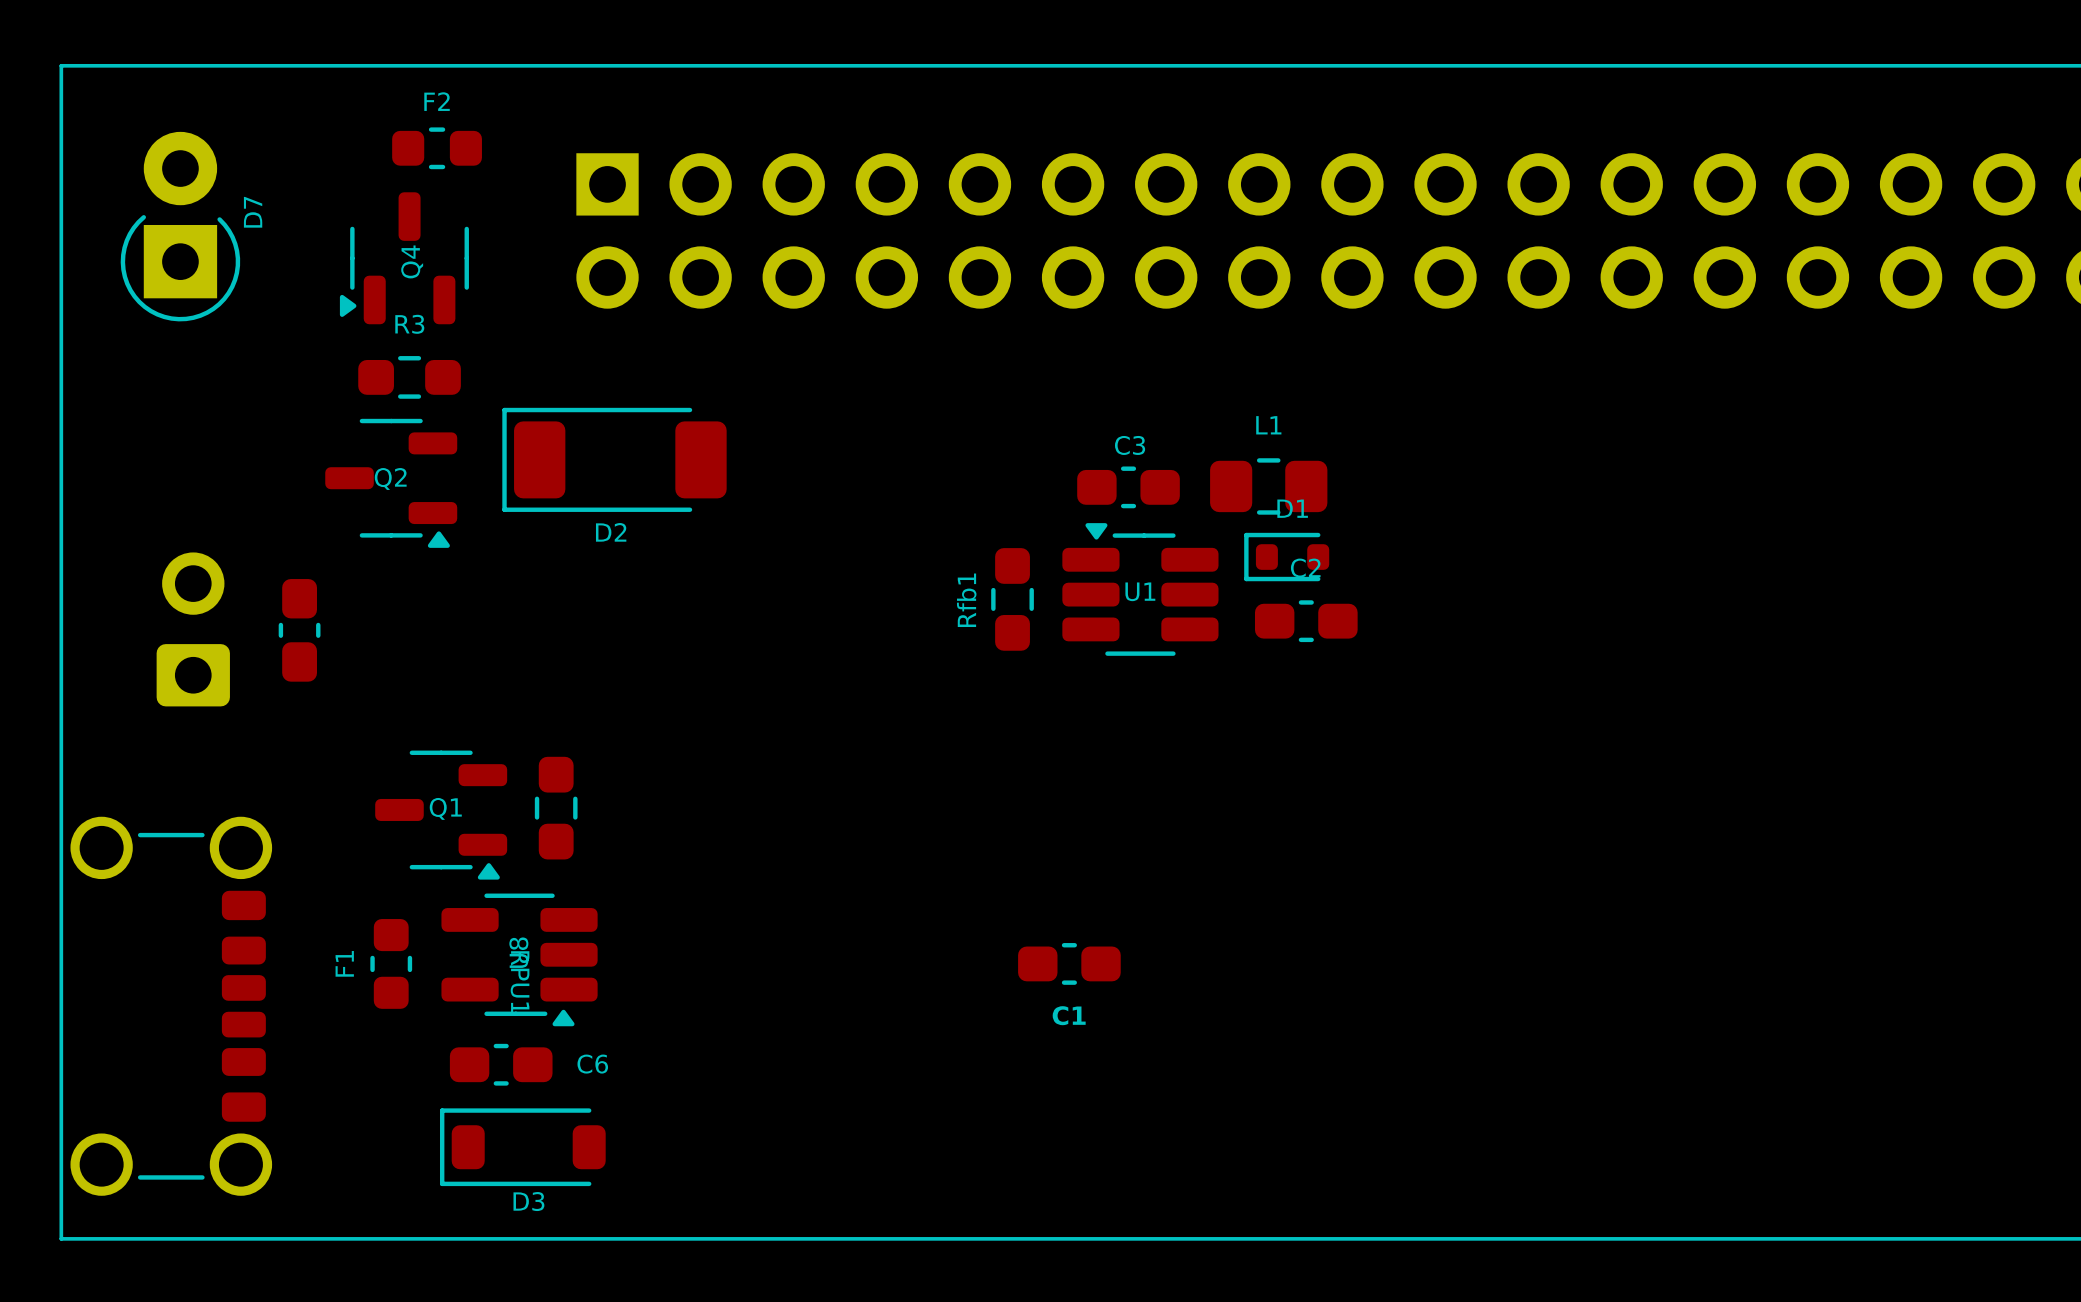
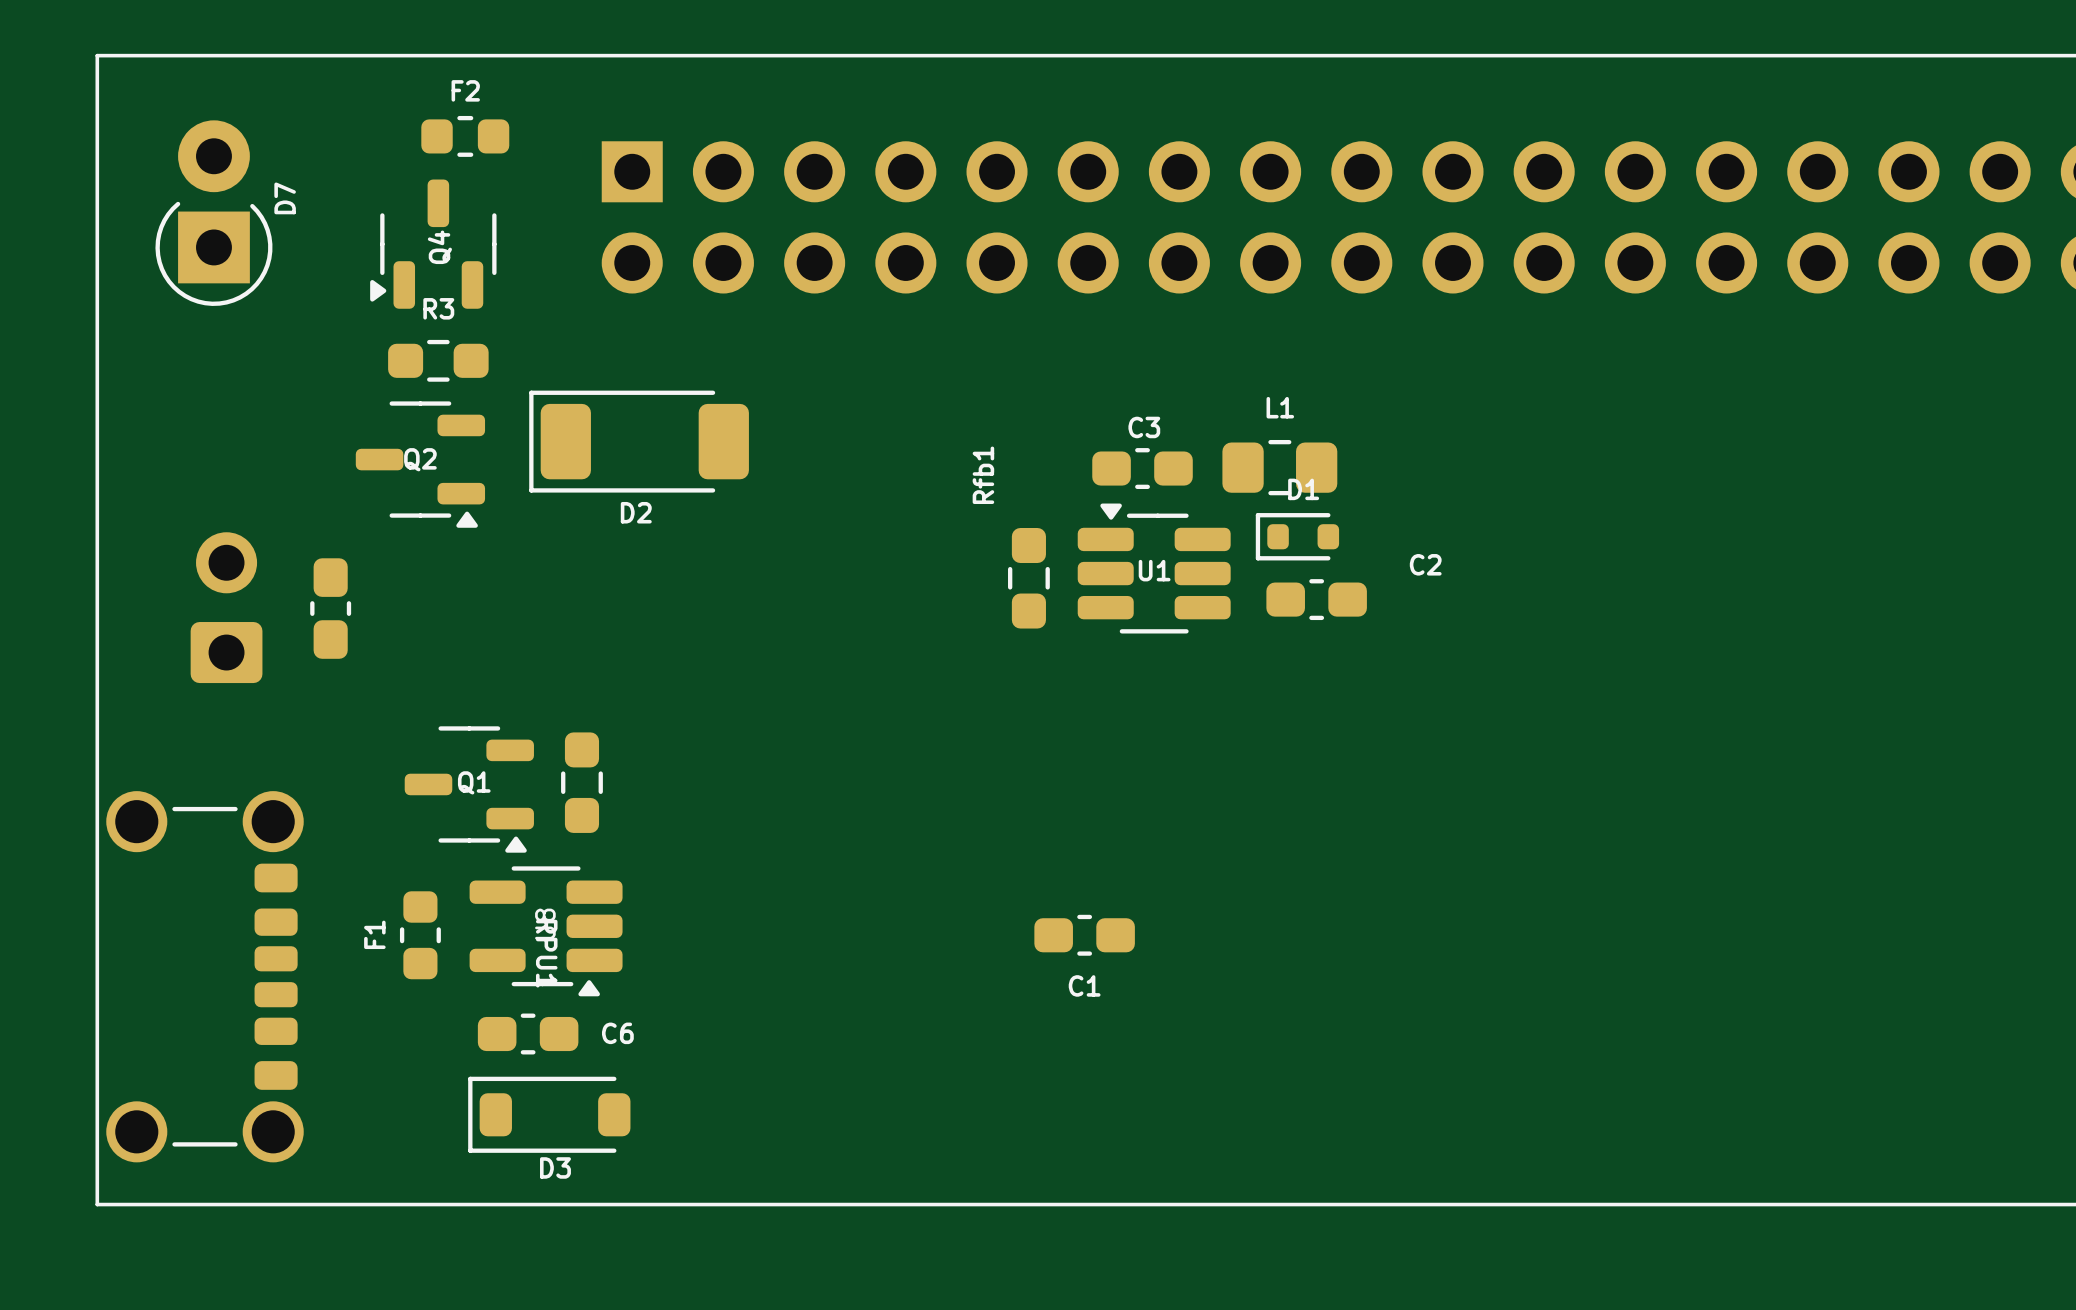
C2 name position: C2 (1305, 568) -> C2 (1425, 564)
Rfb1 name position: Rfb1 (966, 600) -> Rfb1 (983, 475)

